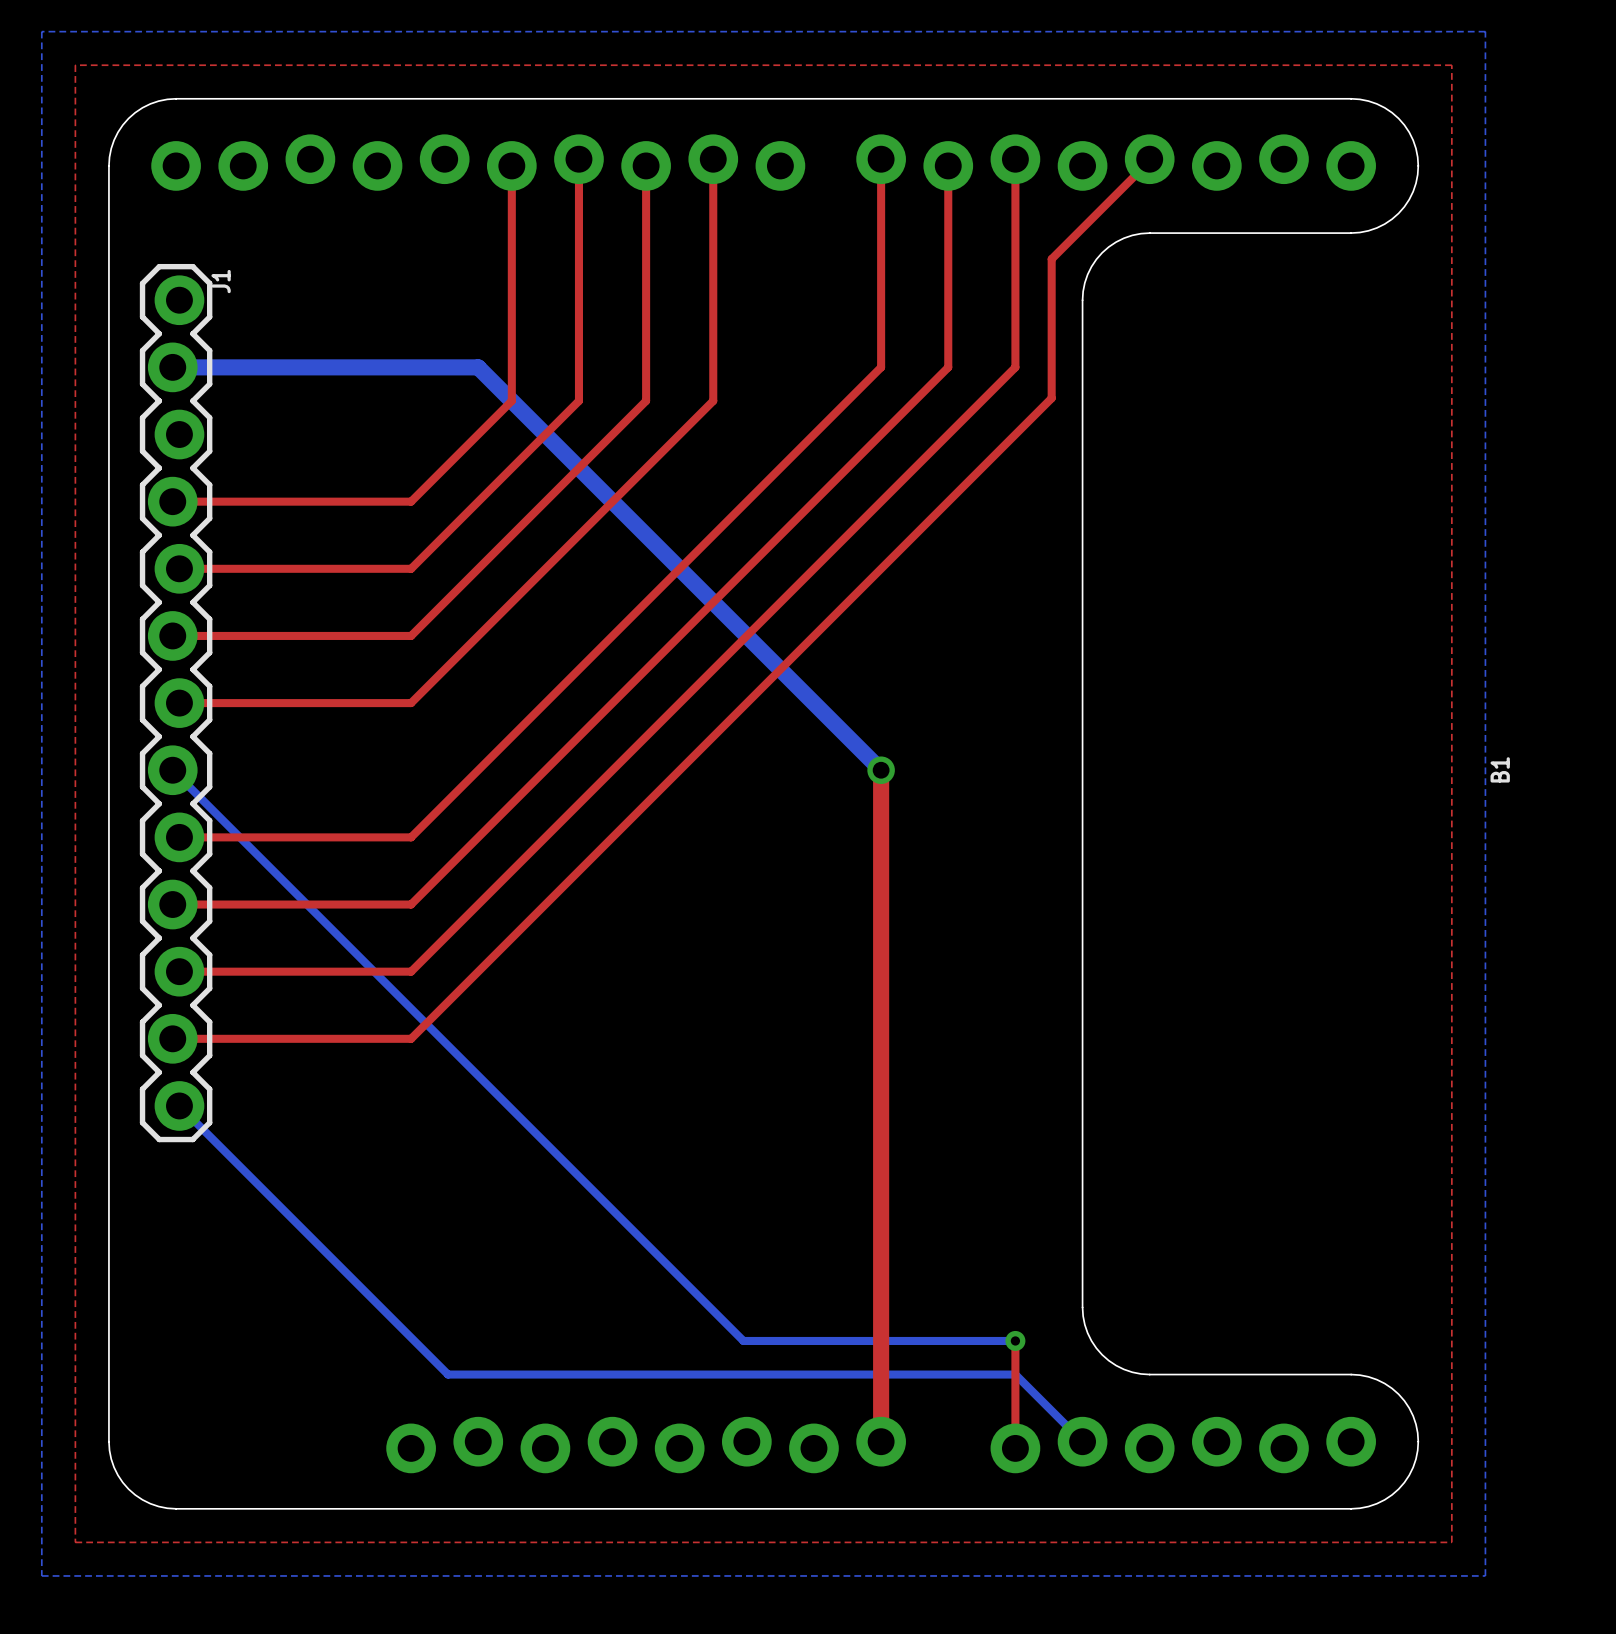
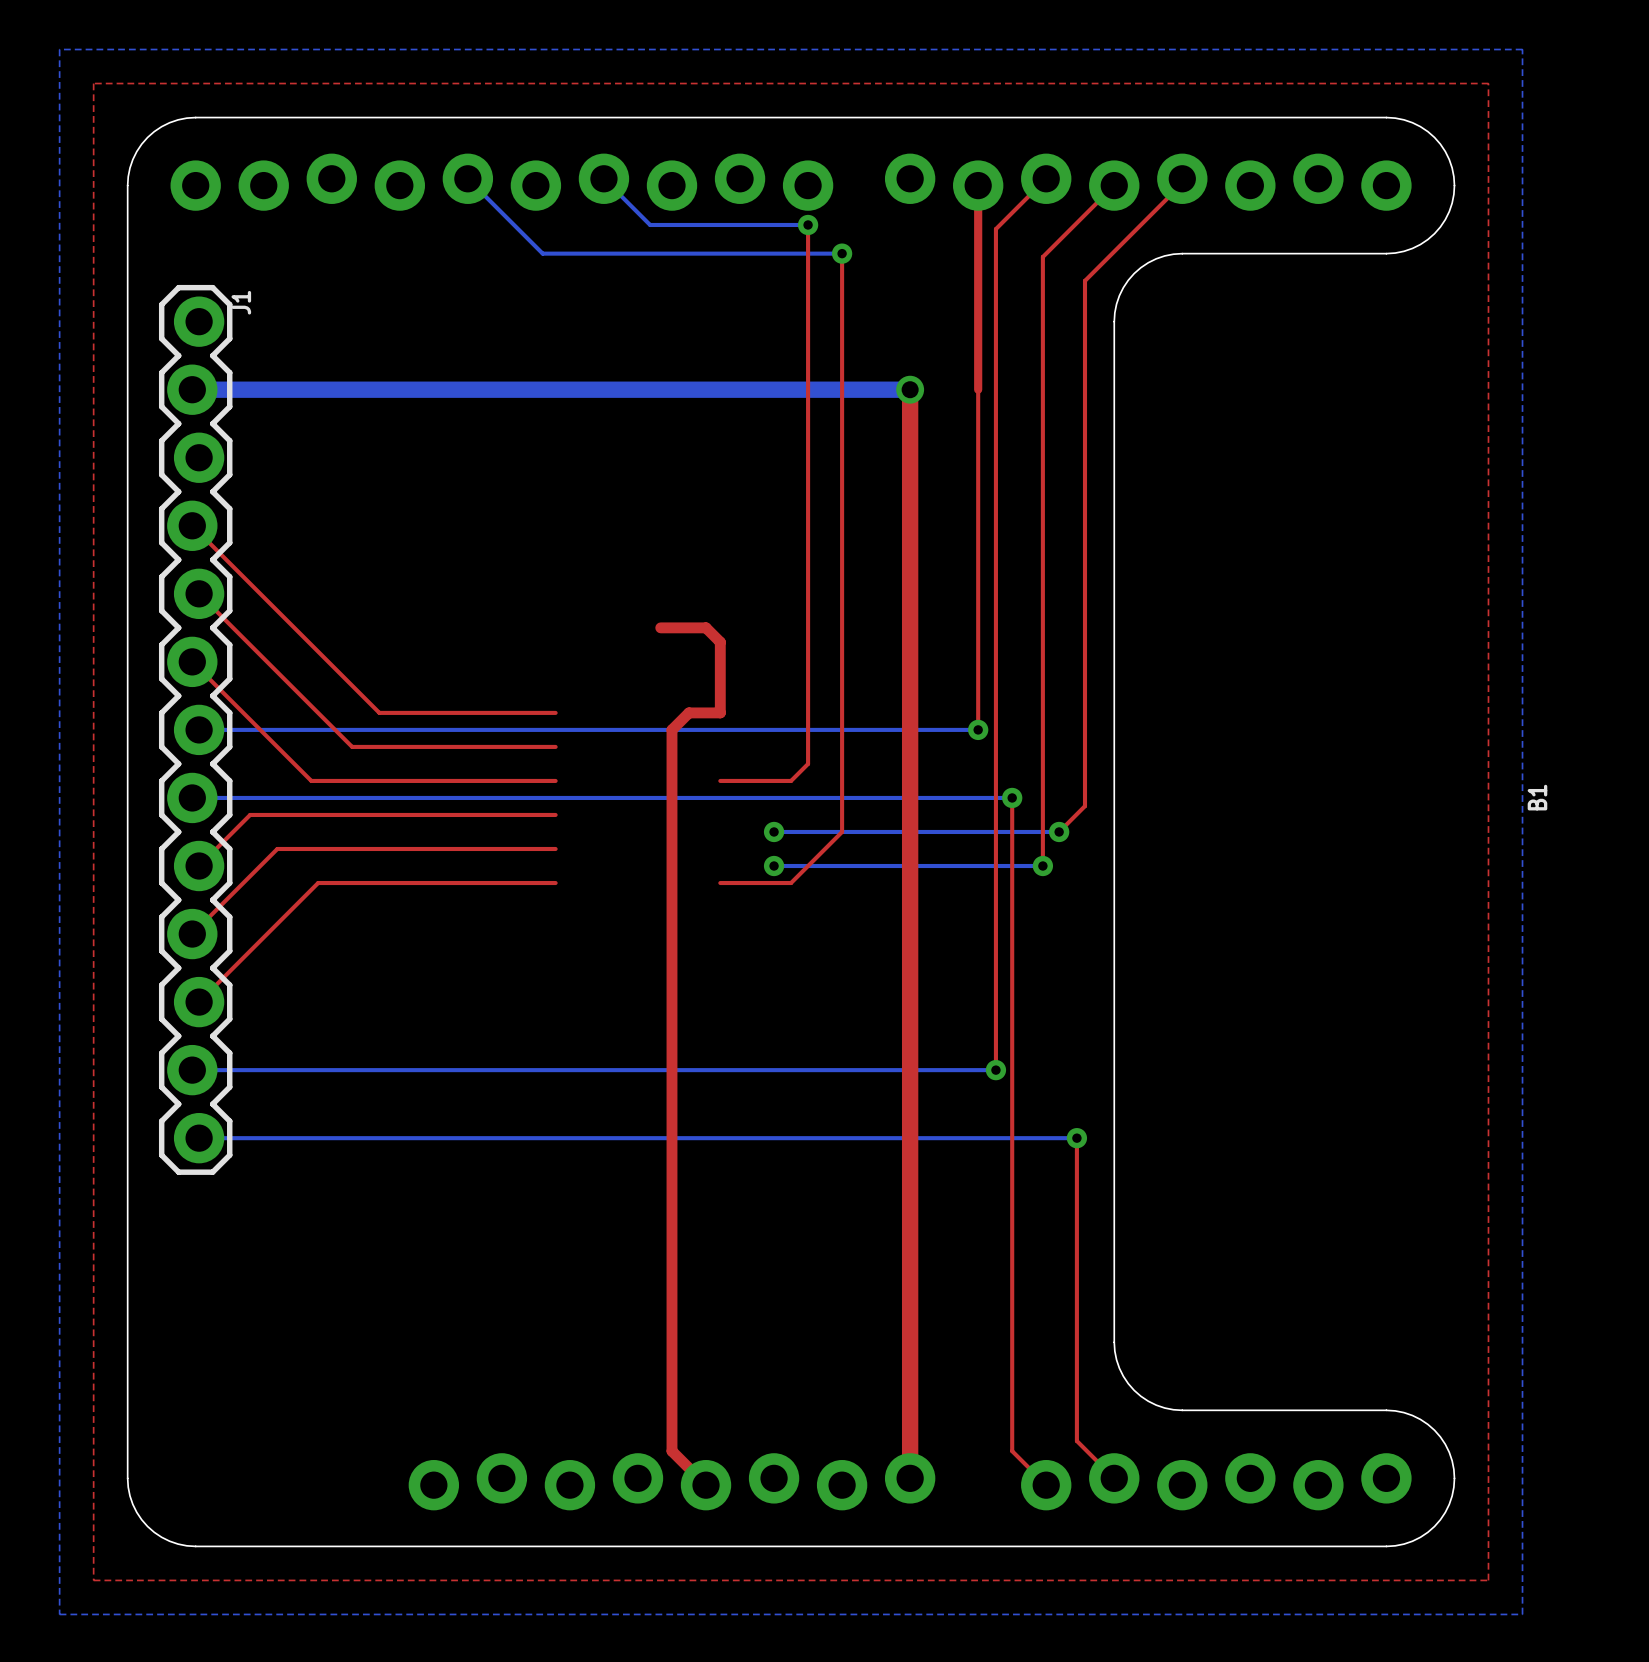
bottom track: none -> (467, 178) (542, 253) (842, 253)
bottom track: none -> (603, 178) (650, 224) (808, 224)
top track: (578, 159) (578, 400) (411, 568) (179, 568) -> (555, 746) (352, 746) (199, 593)
top track: (713, 159) (713, 400) (411, 703) (179, 703) -> none
top track: (881, 159) (881, 367) (411, 837) (179, 837) -> (555, 814) (250, 814) (199, 866)
top track: (1015, 159) (1015, 367) (411, 971) (179, 971) -> (1046, 178) (995, 229) (995, 1070)
top track: (1149, 161) (1051, 259) (1051, 398) (411, 1038) (172, 1038) -> (1182, 180) (1182, 183) (1085, 280) (1085, 806) (1059, 831)
top track: (511, 165) (511, 400) (411, 501) (172, 501) -> (555, 712) (379, 712) (192, 525)
top track: (646, 165) (646, 400) (411, 635) (172, 635) -> (555, 780) (311, 780) (192, 661)
top track: none -> (1114, 185) (1042, 256) (1042, 866)
top track: none -> (808, 224) (808, 763) (791, 780) (720, 780)
via: none -> (808, 224)
top track: none -> (842, 253) (842, 831) (791, 883) (720, 883)
via: none -> (842, 253)
bottom track: (478, 367) (881, 770) -> (501, 389) (910, 389)
top track: none -> (910, 389) (910, 797)
via: none -> (910, 389)
top track: (948, 367) (411, 904) (172, 904) -> (555, 848) (277, 848) (192, 934)
top track: none -> (978, 389) (978, 729)
top track: none -> (660, 627) (706, 627) (720, 642) (720, 712) (689, 712) (671, 729) (671, 1451) (706, 1485)
bottom track: none -> (199, 729) (978, 729)
via: none -> (978, 729)
bottom track: (172, 770) (743, 1340) (1015, 1340) -> (192, 797) (1012, 797)
via: (881, 770) -> none
via: none -> (1012, 797)
bottom track: none -> (774, 831) (1059, 831)
via: none -> (774, 831)
via: none -> (1059, 831)
bottom track: none -> (774, 866) (1042, 866)
via: none -> (774, 866)
via: none -> (1042, 866)
top track: none -> (555, 883) (318, 883) (199, 1002)
bottom track: none -> (192, 1070) (995, 1070)
via: none -> (995, 1070)
bottom track: (179, 1105) (448, 1374) (1015, 1374) (1082, 1441) -> (199, 1138) (1076, 1138)
top track: none -> (1076, 1138) (1076, 1441) (1114, 1478)
via: none -> (1076, 1138)
top track: (1015, 1340) (1015, 1448) -> (1012, 797) (1012, 1451) (1046, 1485)
via: (1015, 1340) -> none

